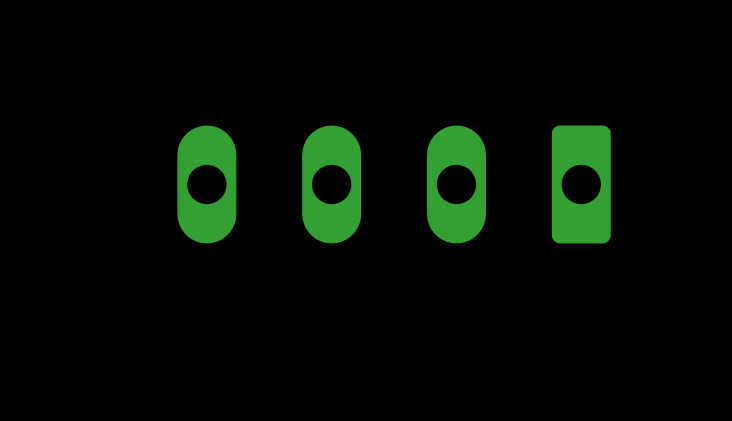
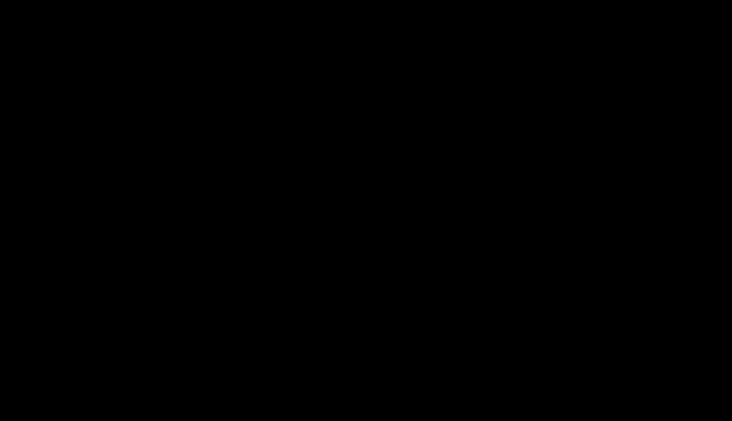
part: (394, 184) -> none

